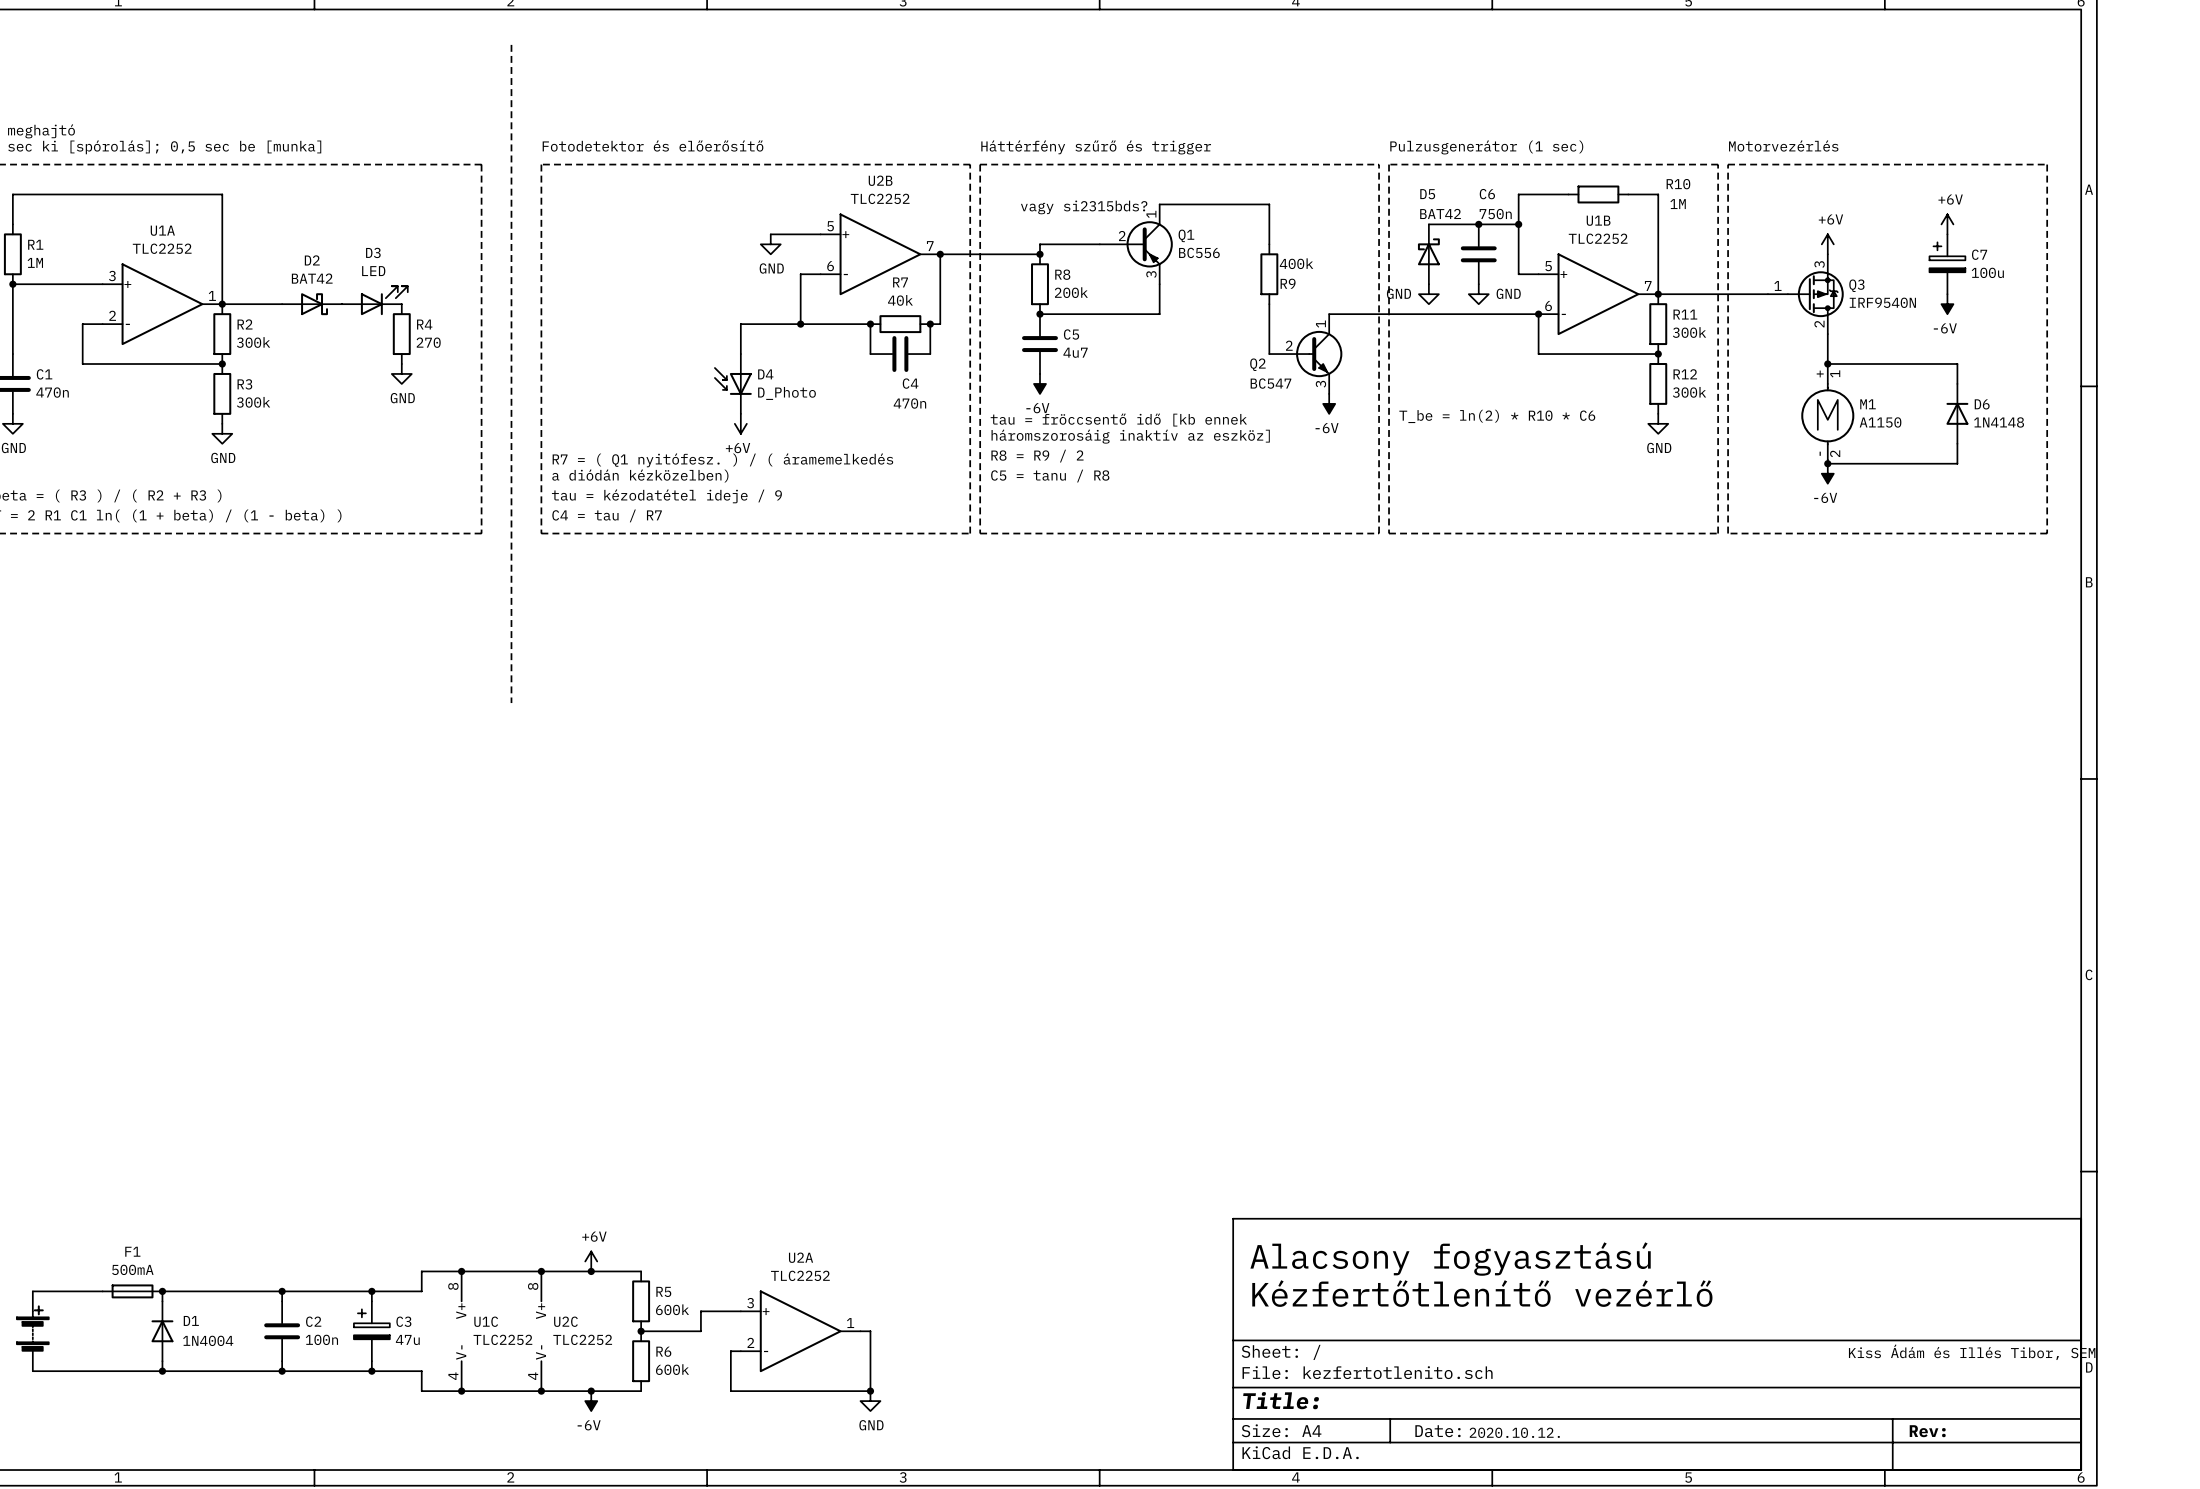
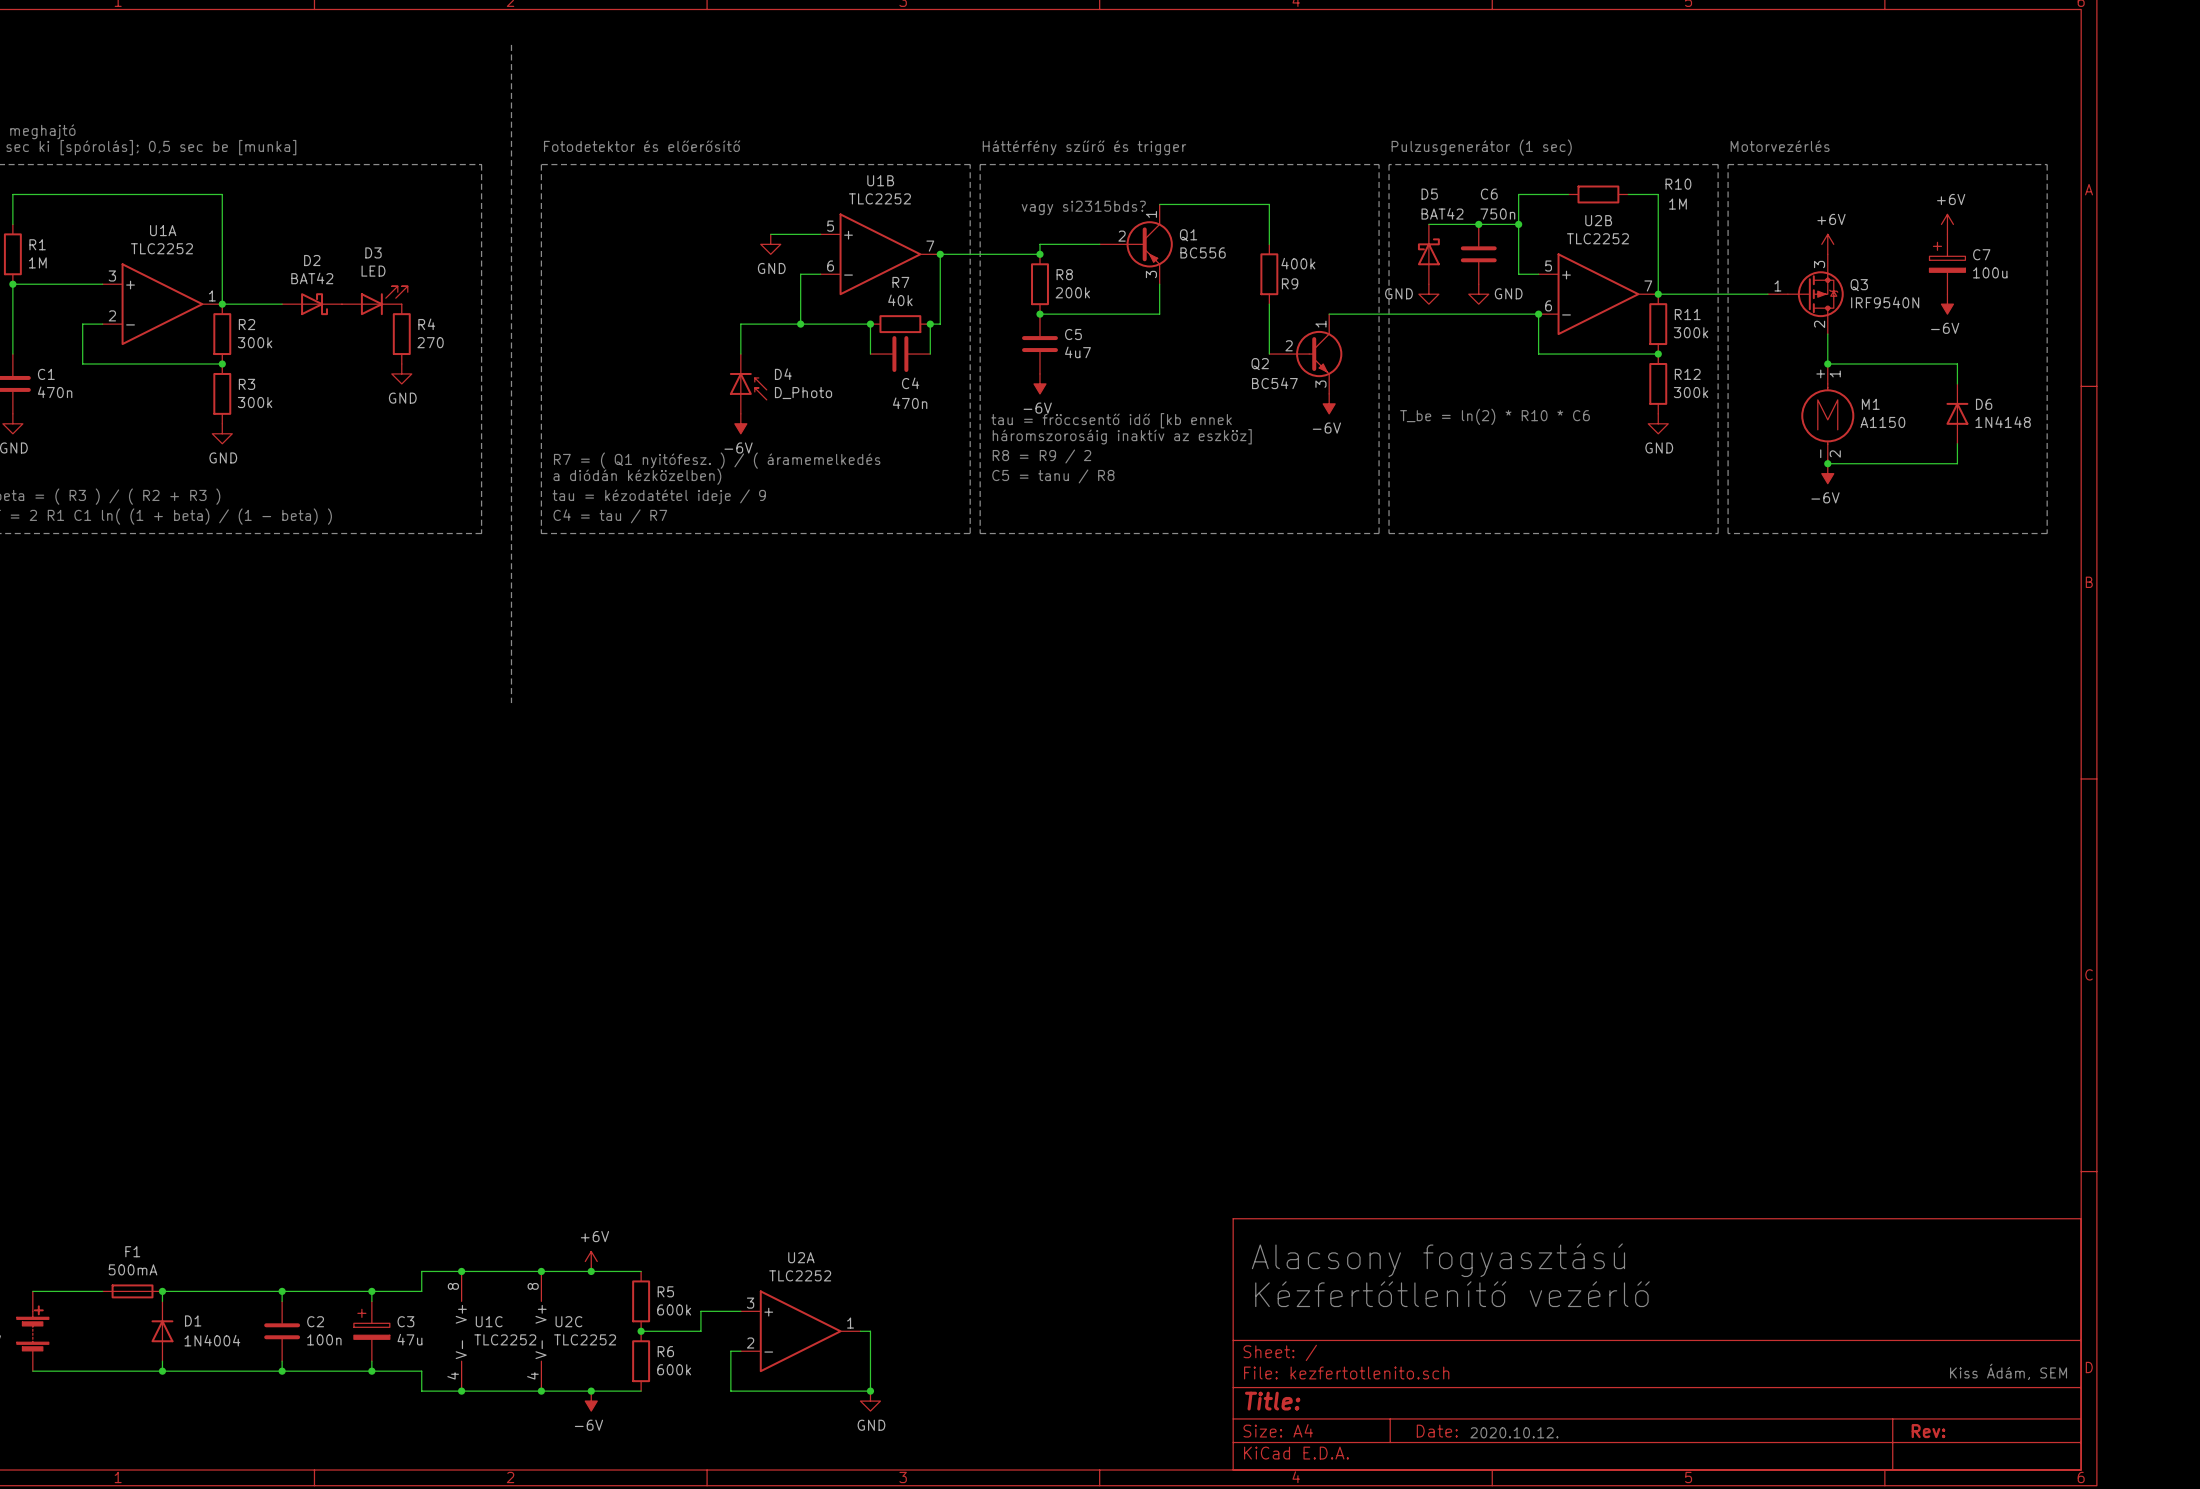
U2B name: U2B (880, 180) -> U1B (880, 180)
U1B name: U1B (1598, 220) -> U2B (1598, 220)
D4 rotation: 0° (733, 381) -> 180° (748, 386)
power symbol: +6V (740, 423) -> -6V (740, 423)
text: Kiss Ádám és Illés Tibor, SEM (1972, 1352) -> Kiss Ádám, SEM (2008, 1371)

